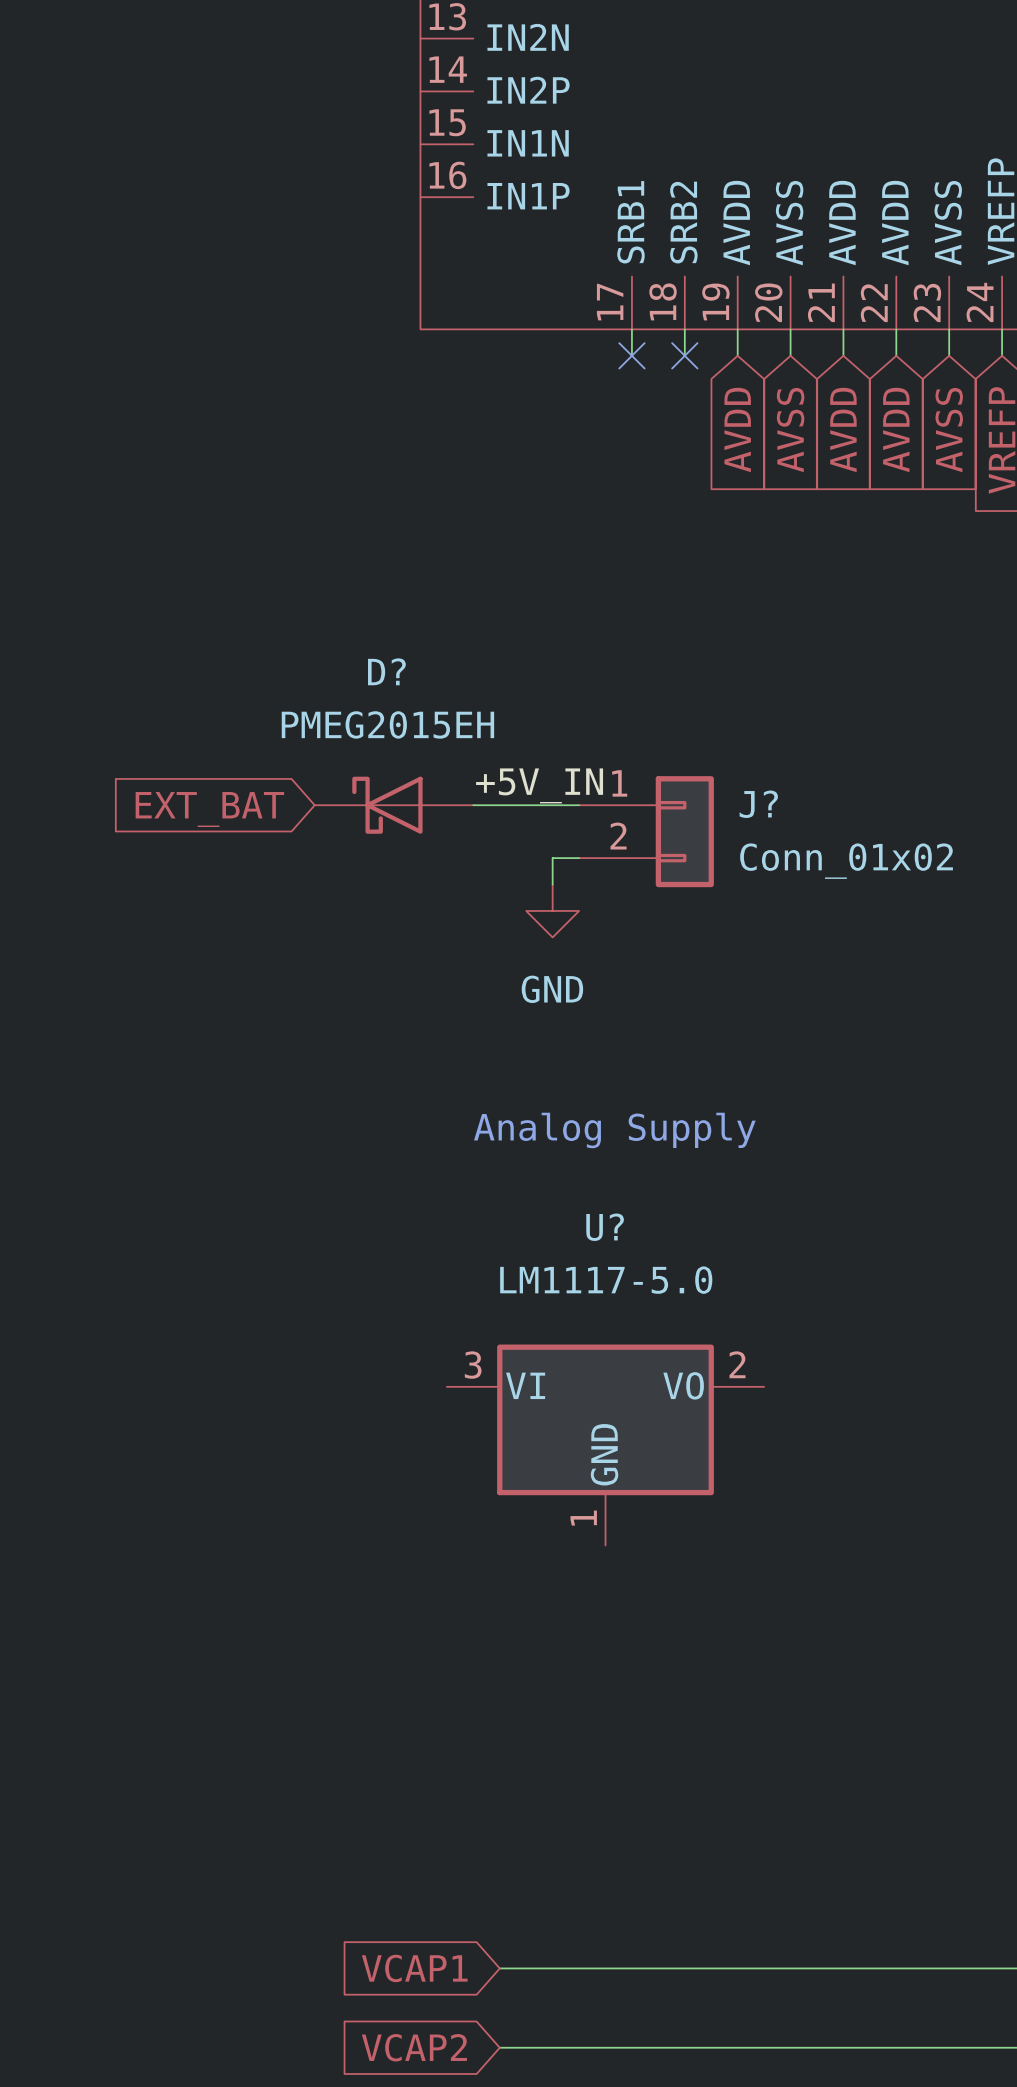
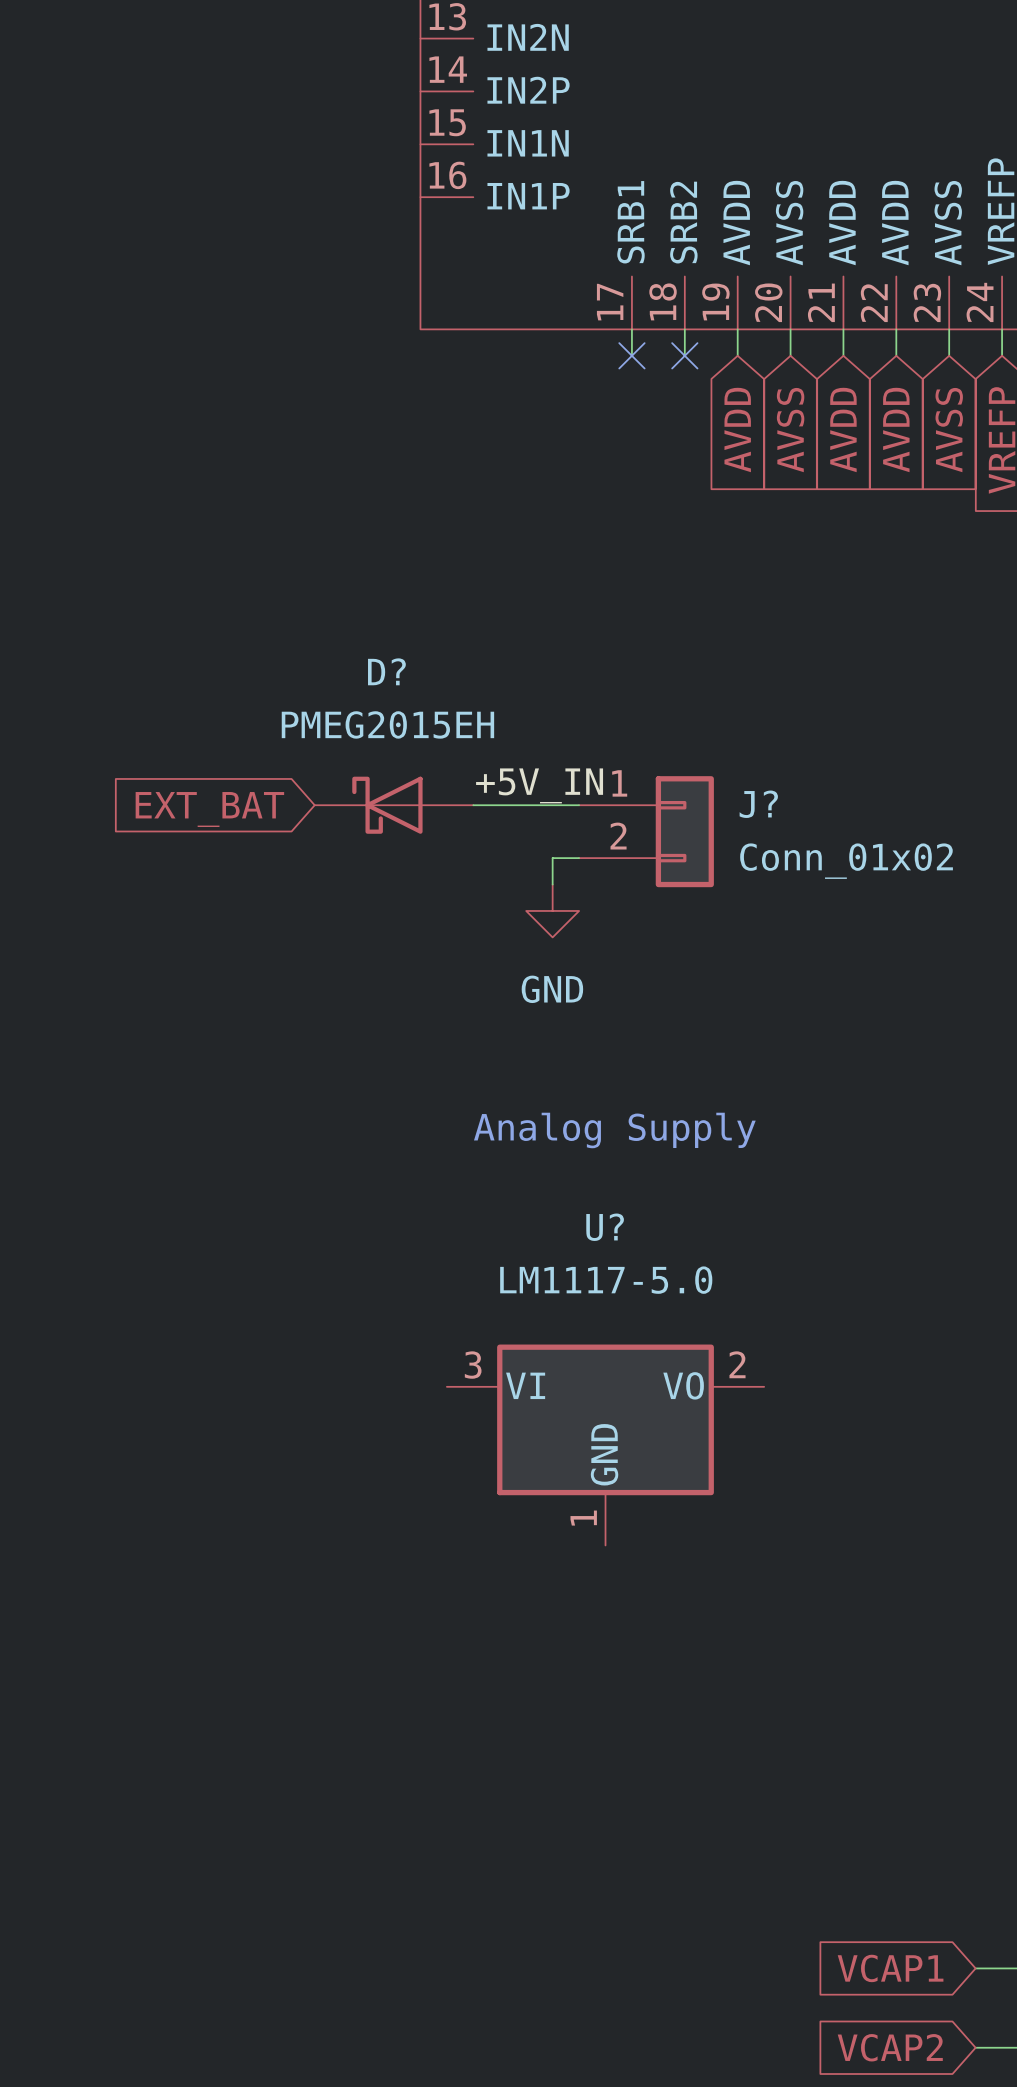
global label position: VCAP1 (414, 1968) -> VCAP1 (890, 1968)
wire: (499, 1968) (975, 1968) -> none
global label position: VCAP2 (414, 2047) -> VCAP2 (890, 2047)
wire: (499, 2047) (975, 2047) -> none

